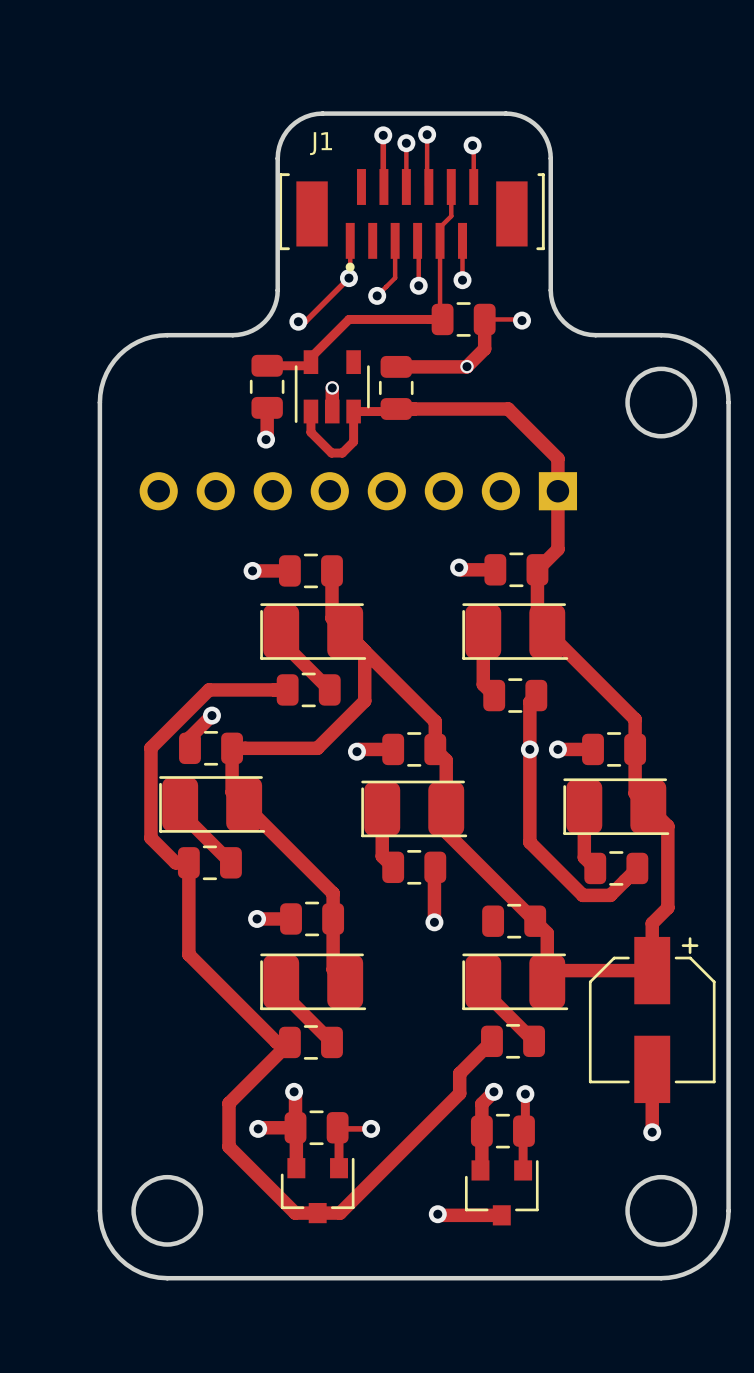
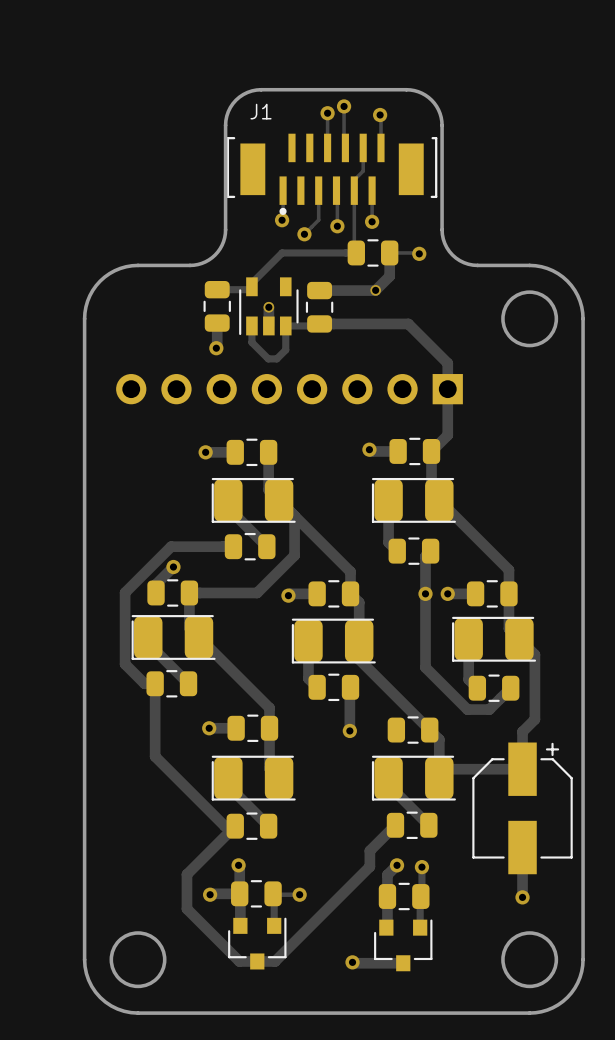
track: (383, 135) (383, 186) -> none
via: (383, 135) -> none
track: (348, 278) (305, 321) (298, 321) -> none
via: (298, 321) -> none

